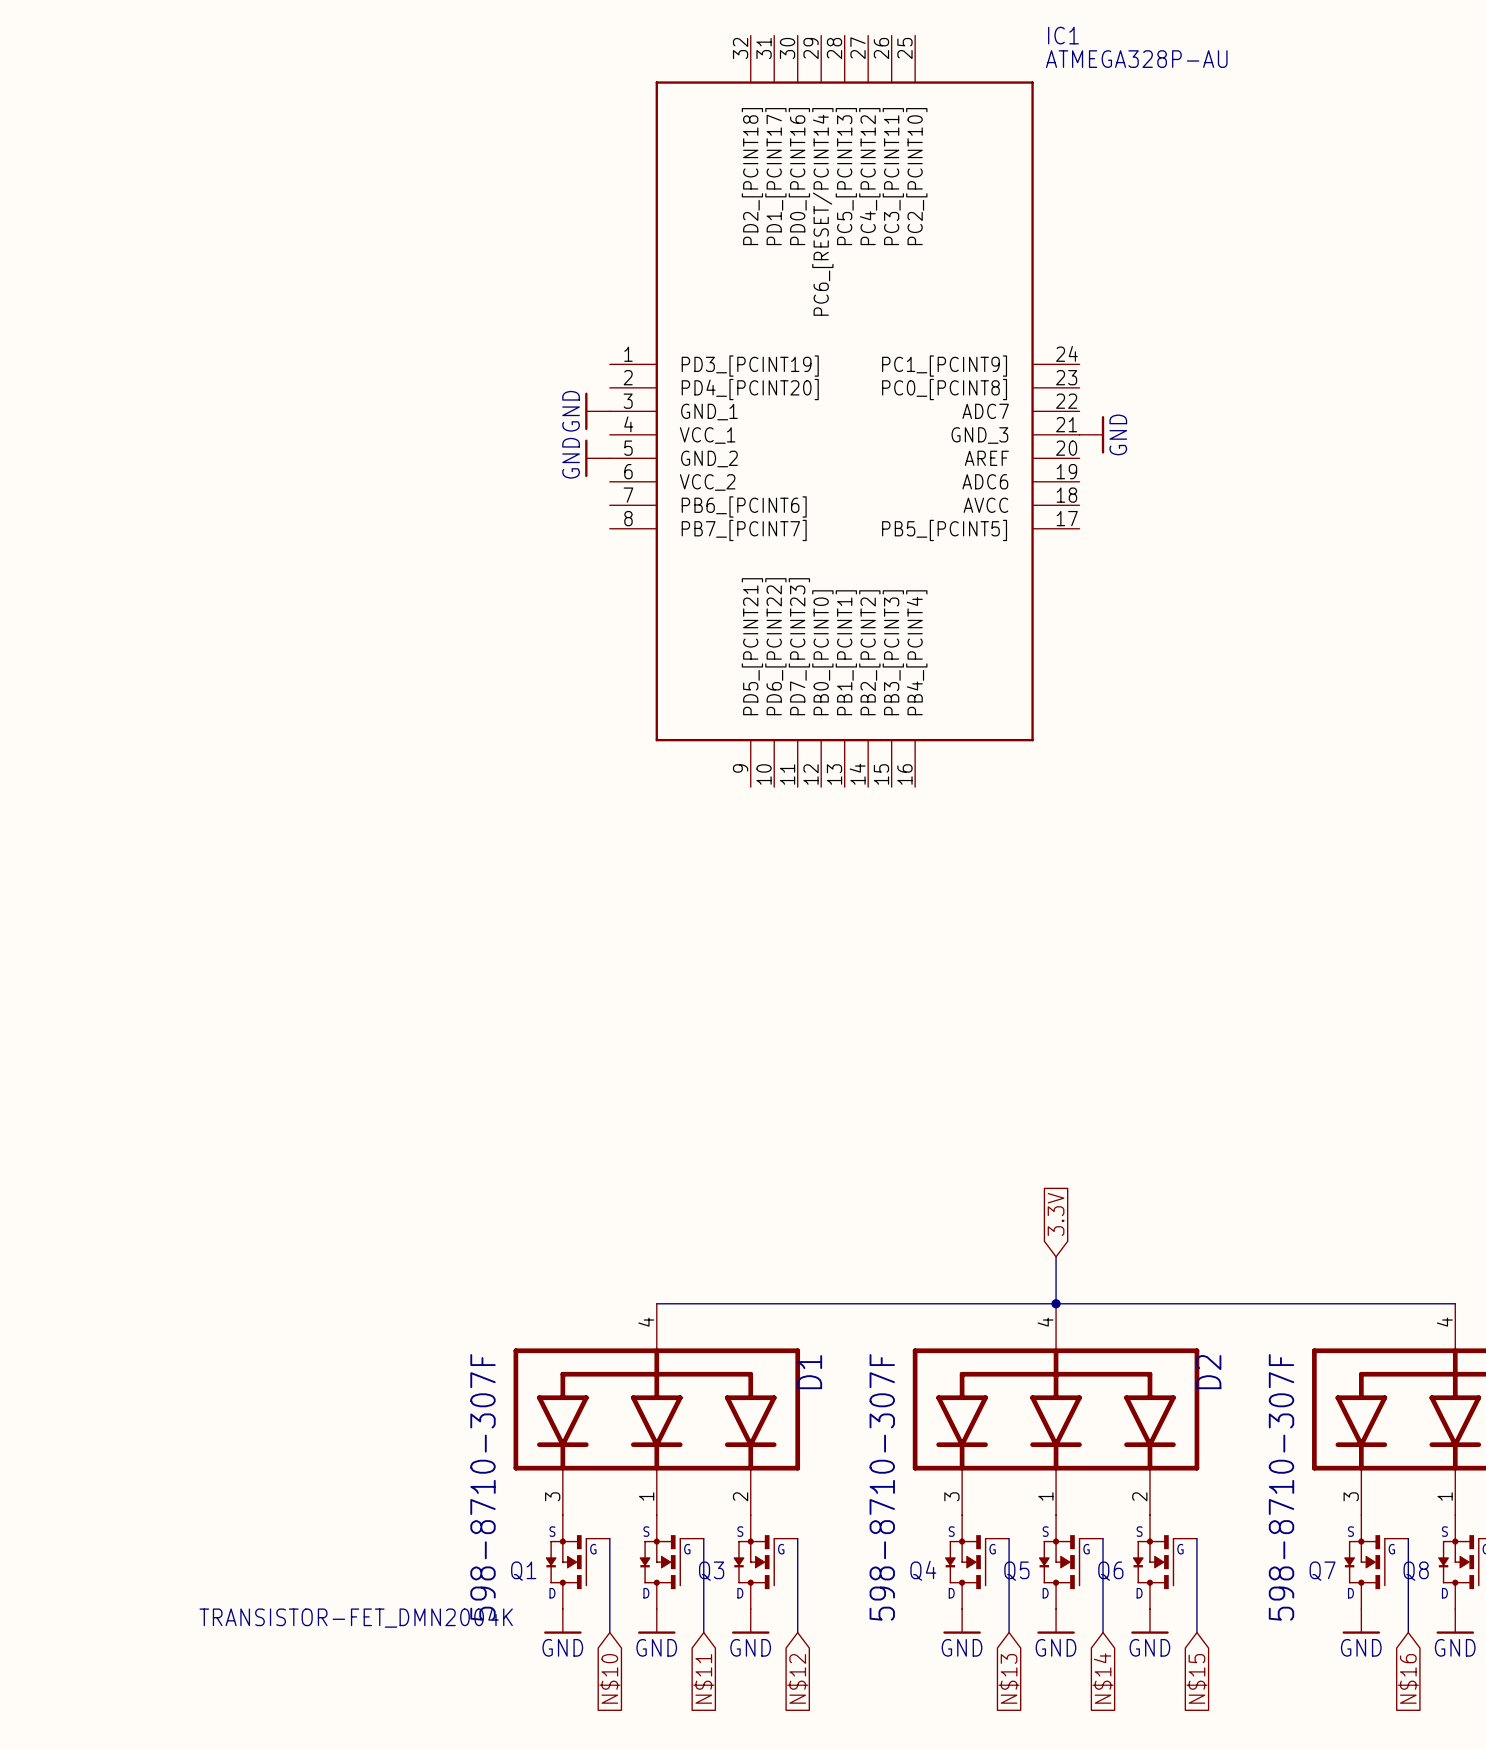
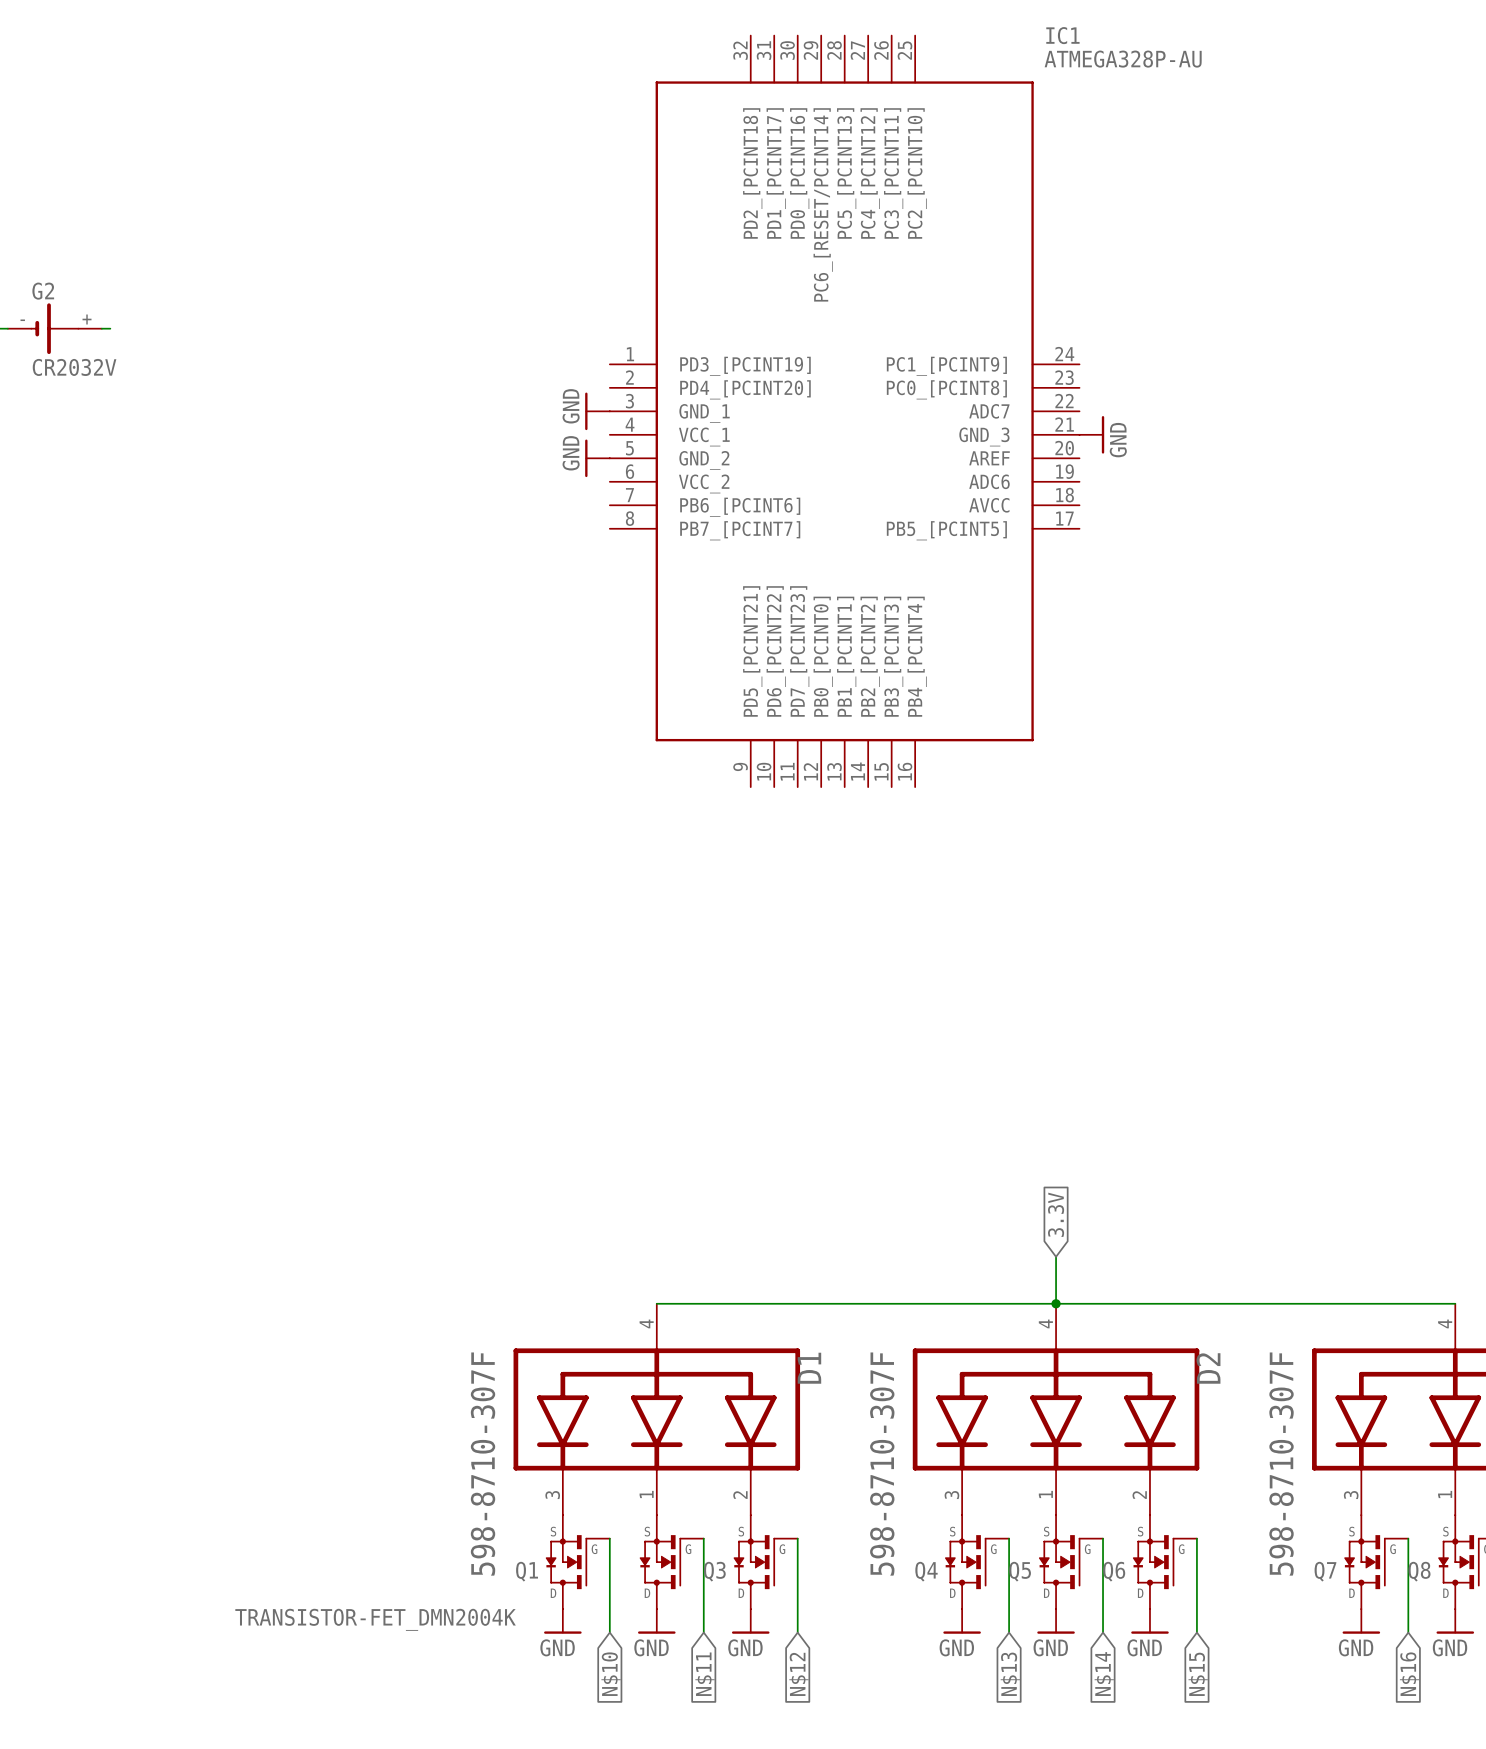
wire: none -> (0, 328) (7, 328)
G2: none -> CR2032V (54, 328)
wire: none -> (101, 328) (110, 328)

